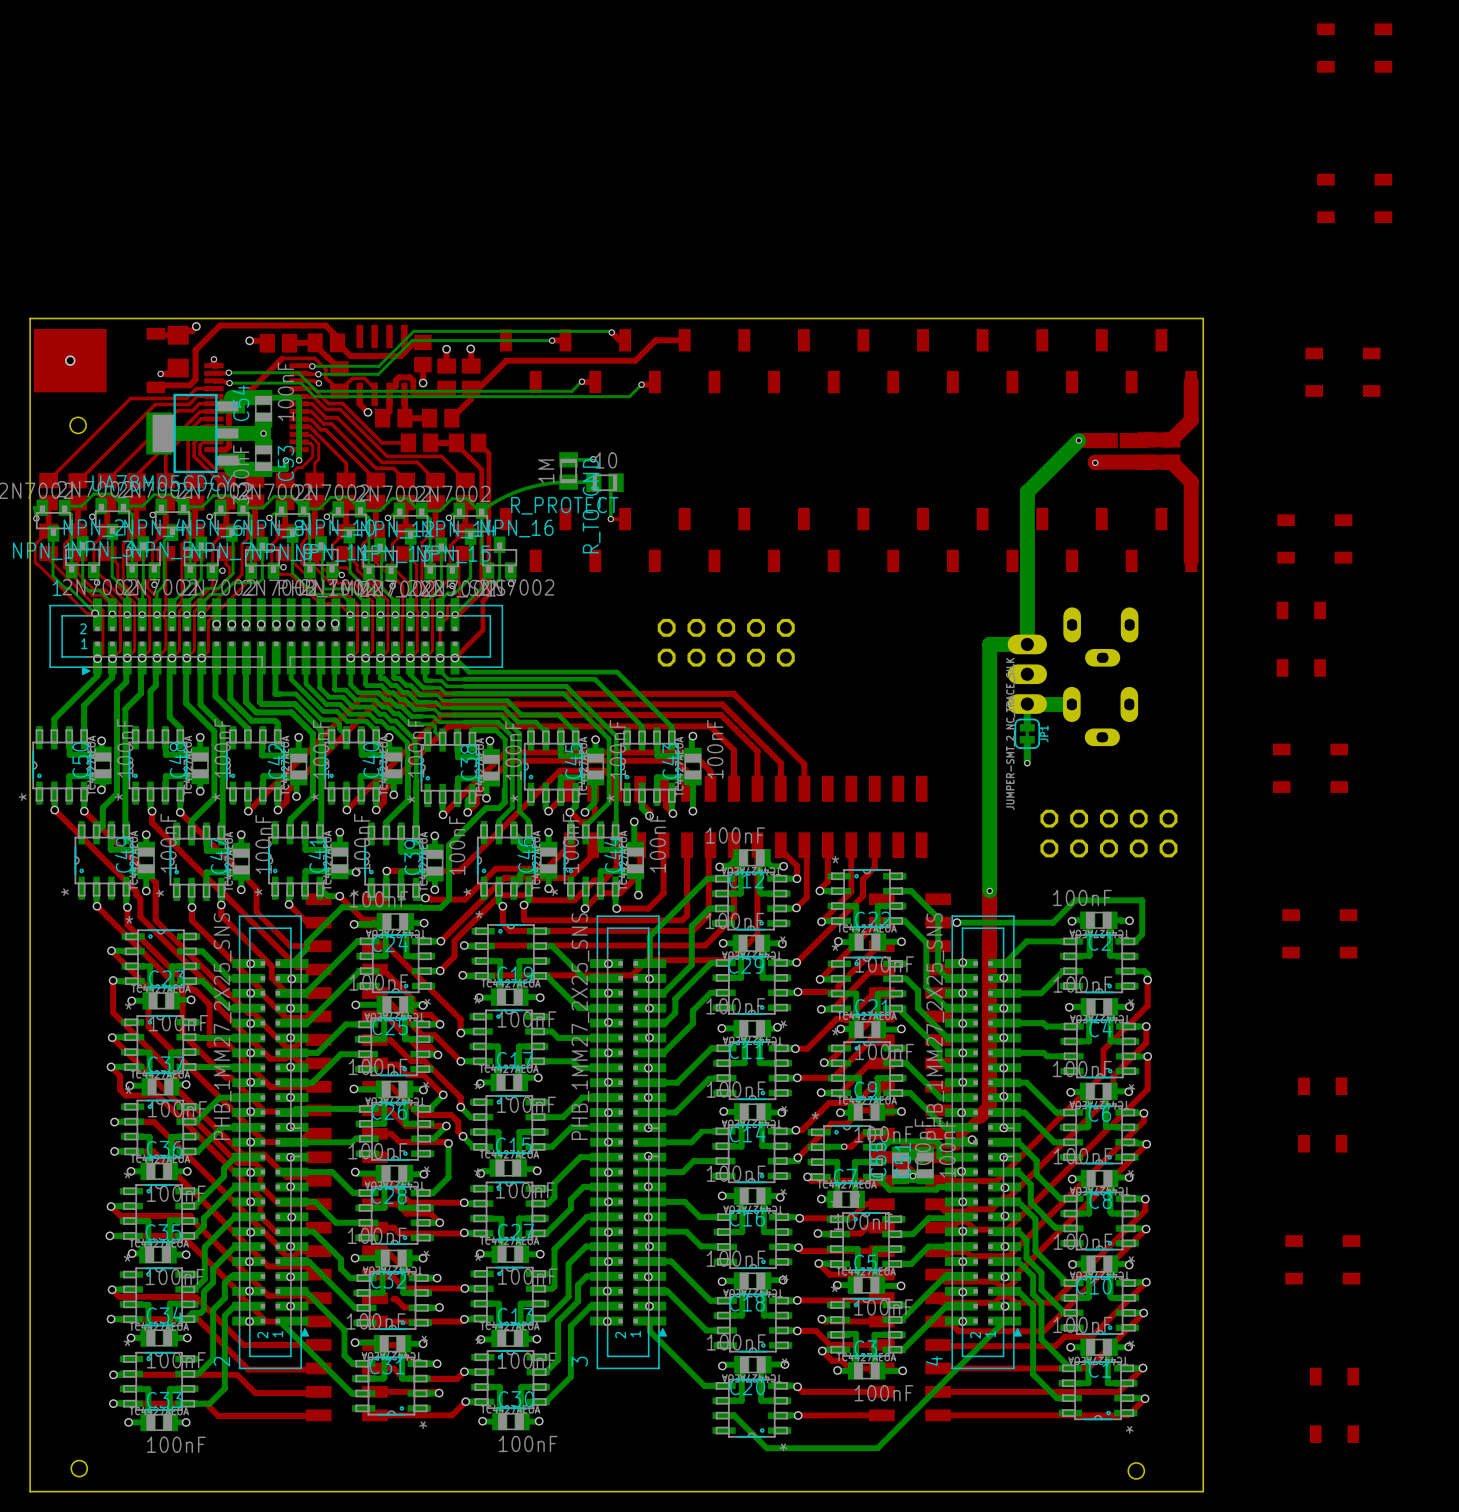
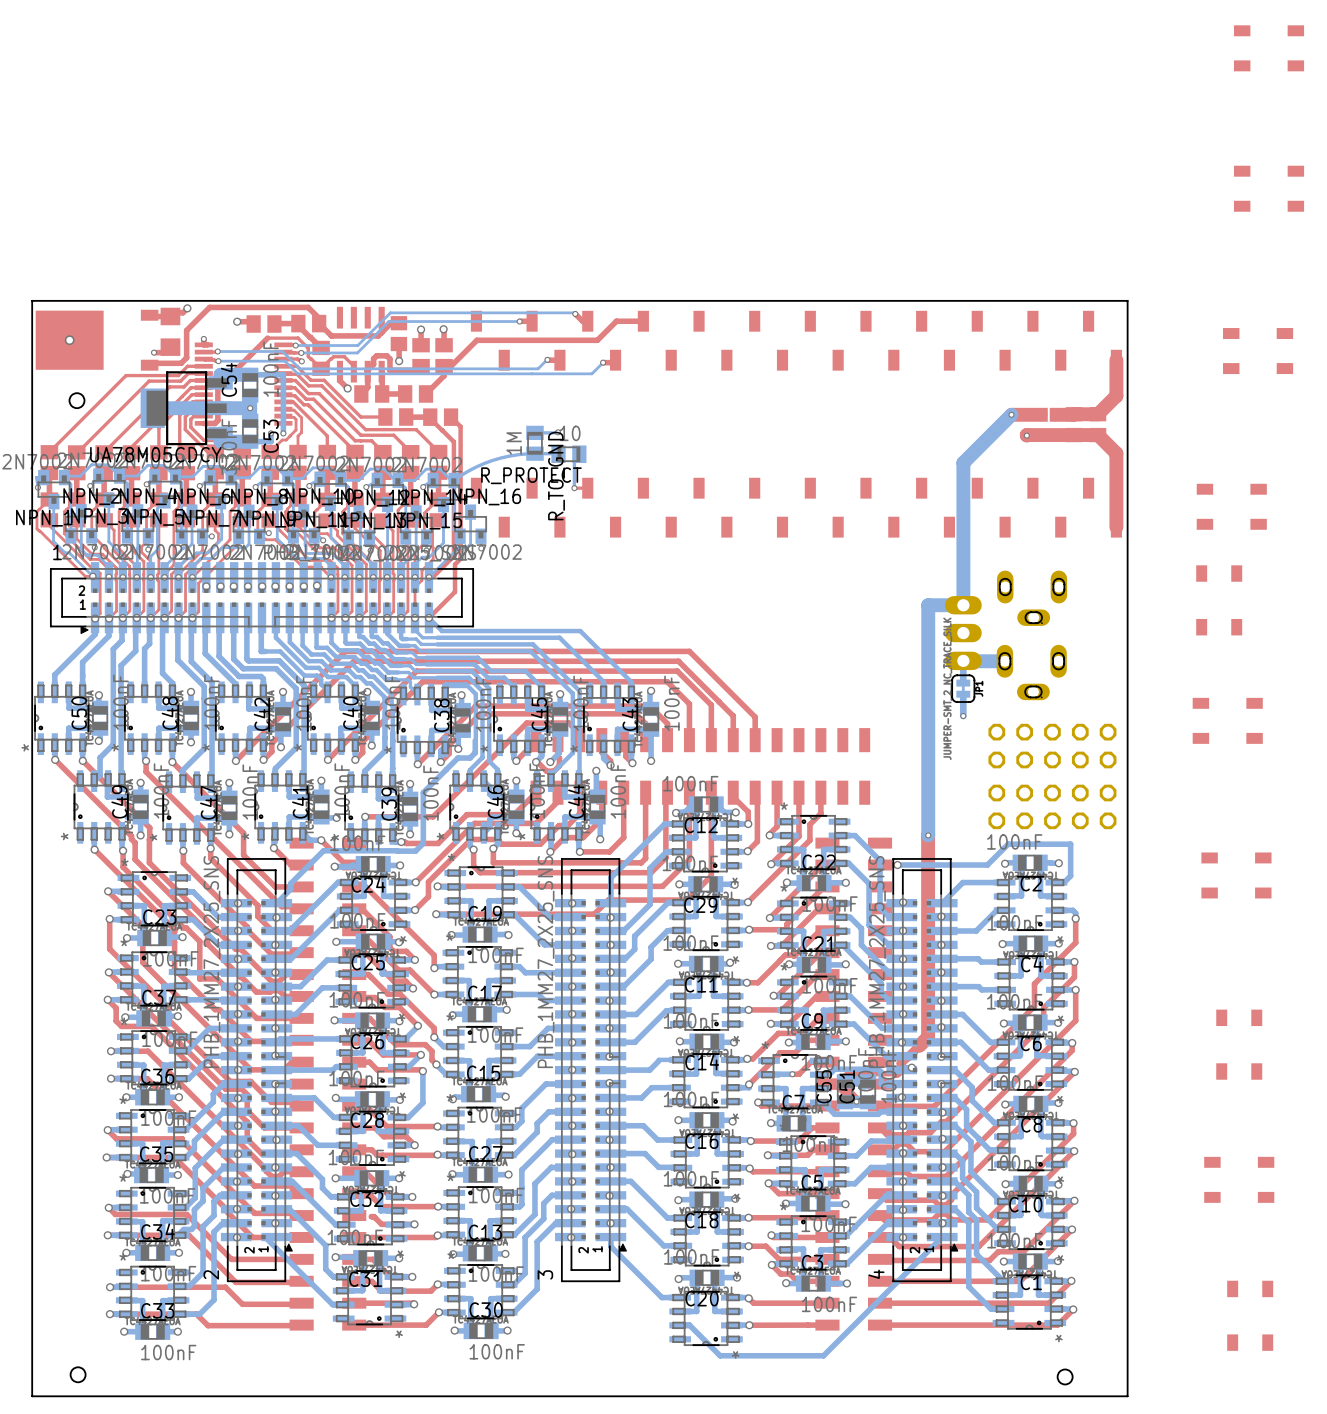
part: (726, 642) -> none
part: none -> (1052, 746)
part: (1108, 833) -> none
part: none -> (1052, 806)

